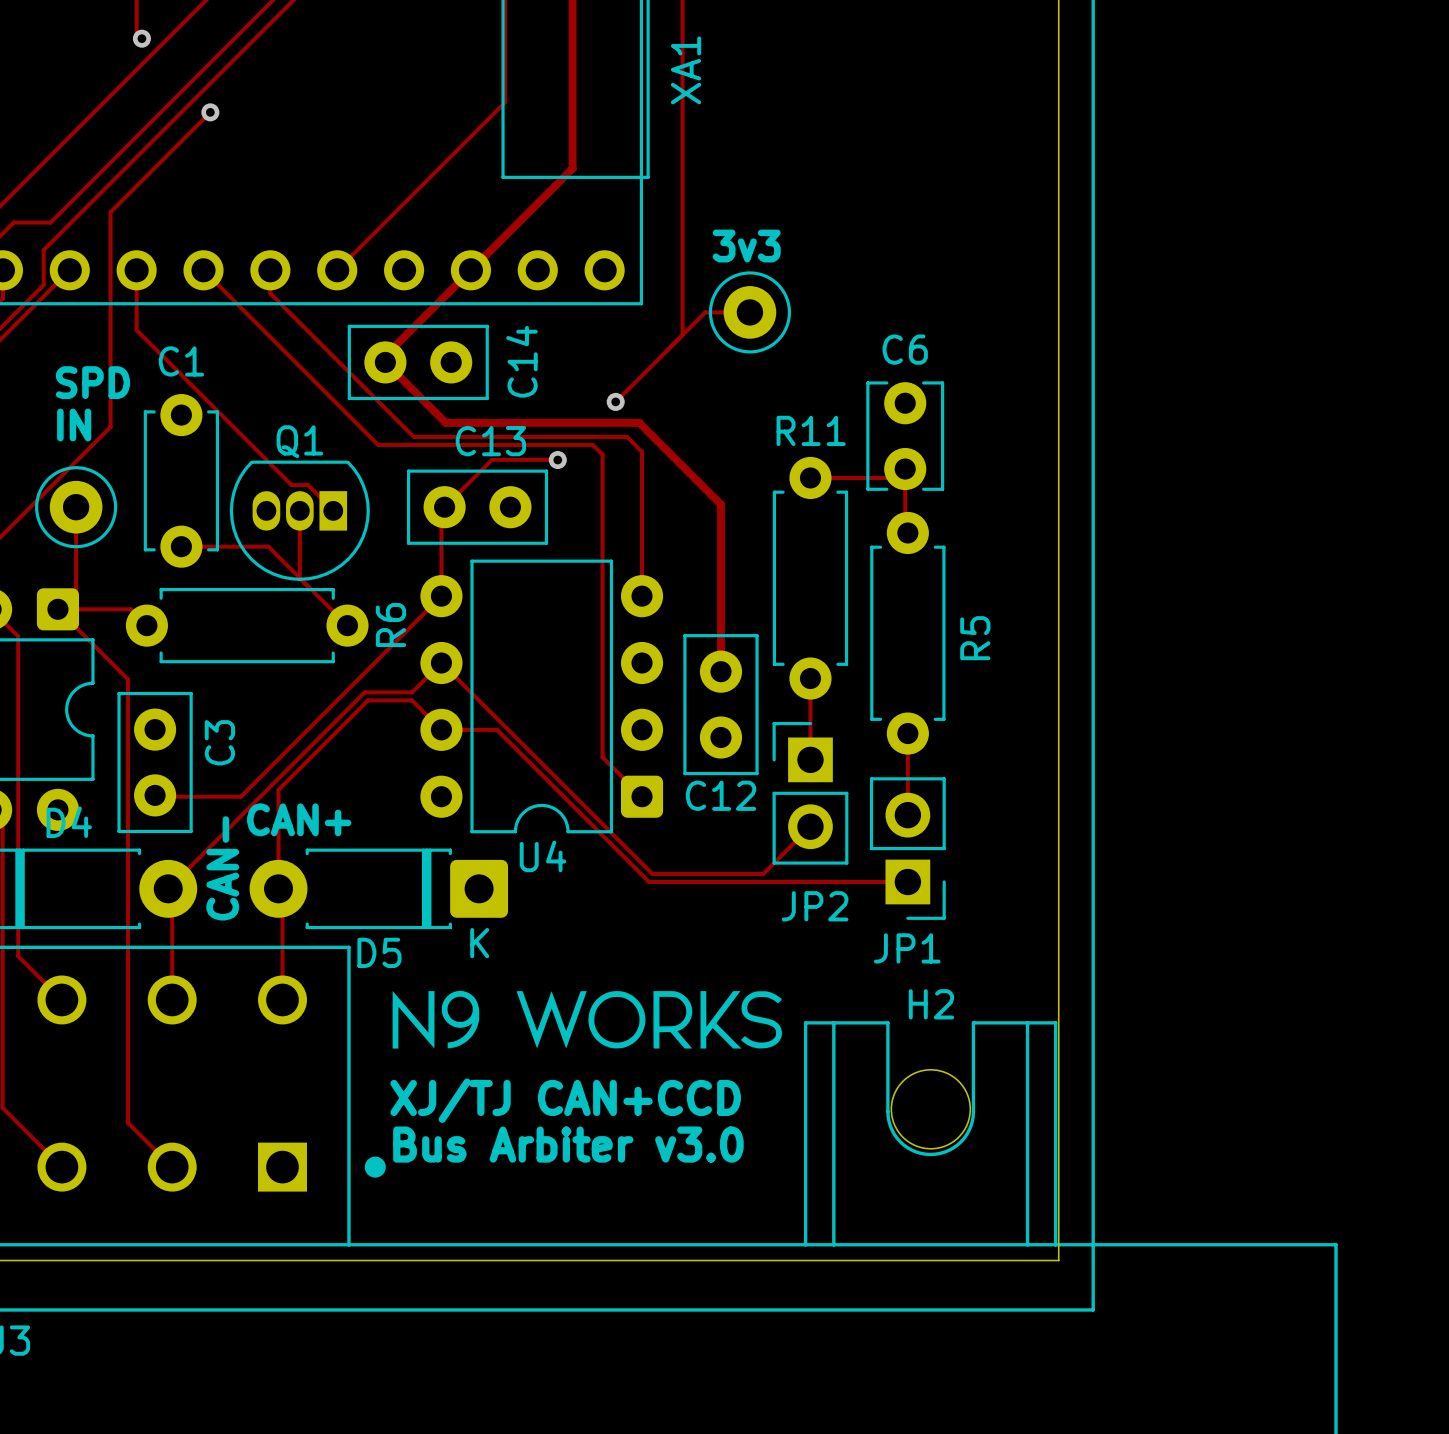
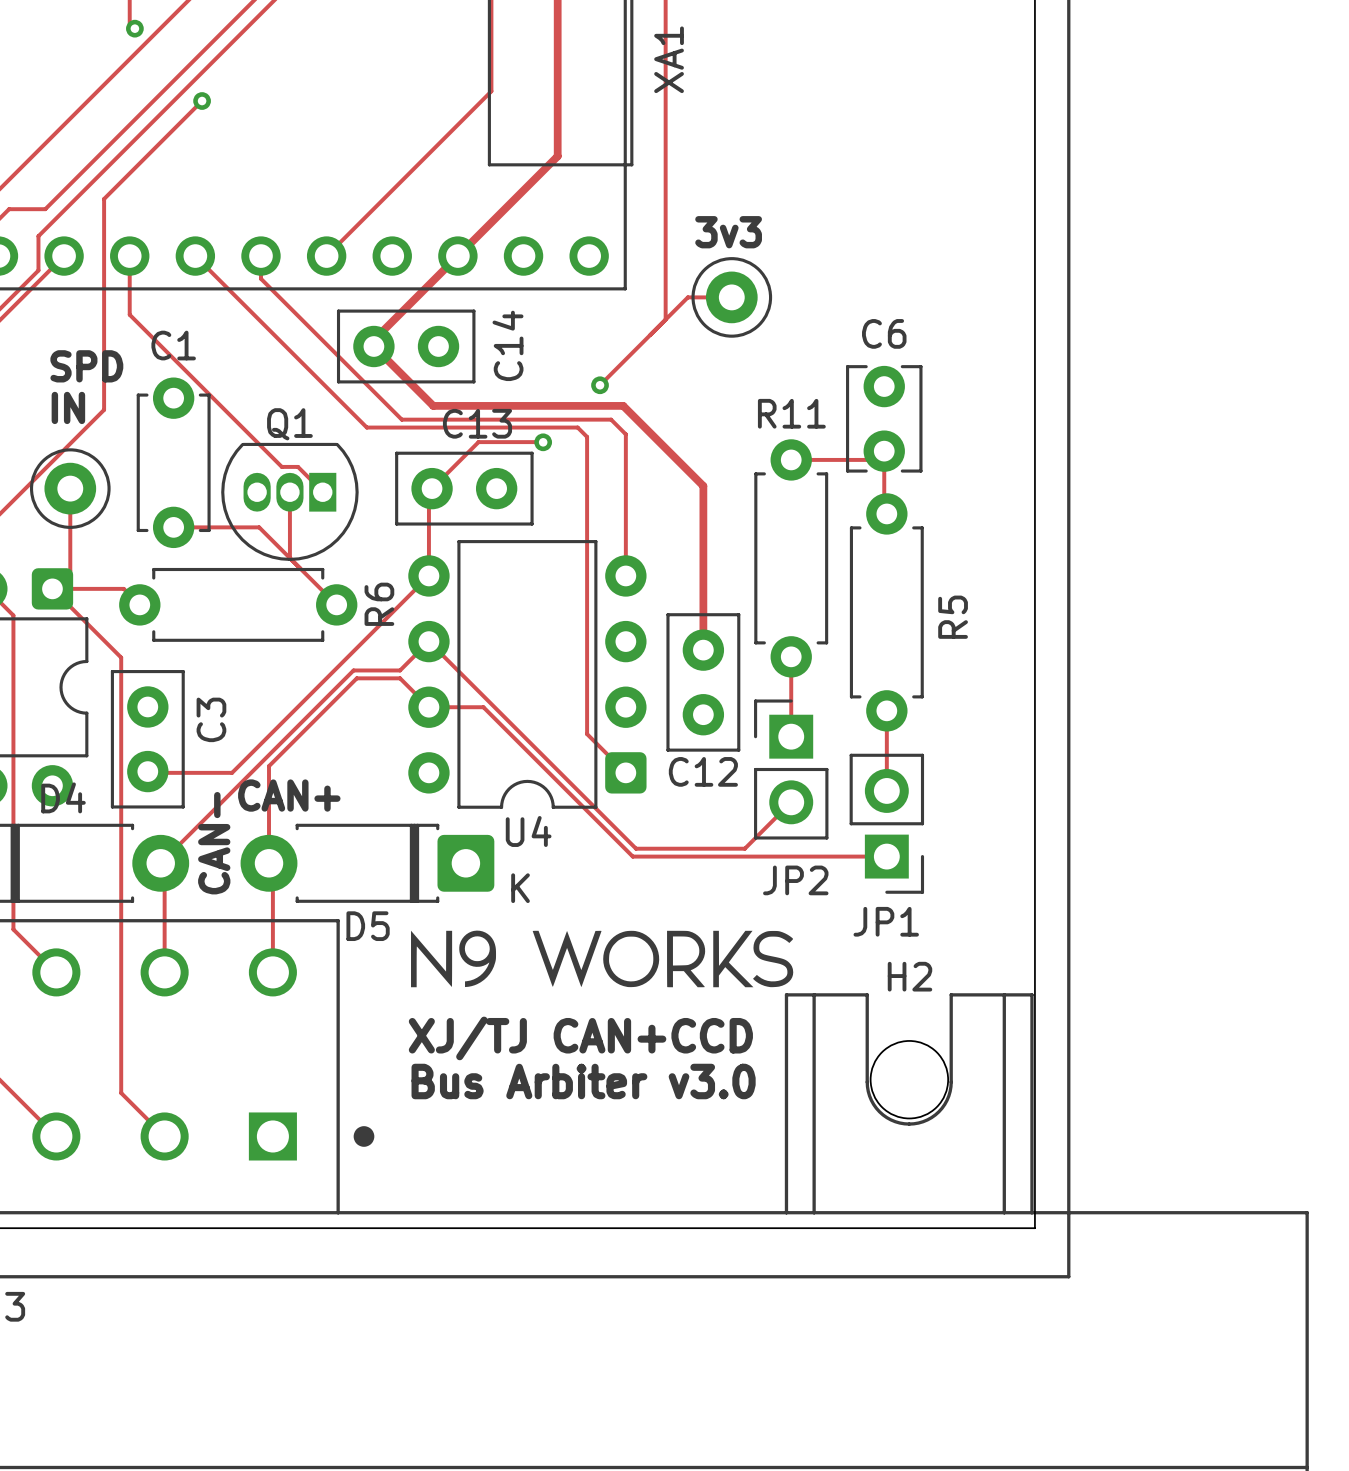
D5 text position: K (479, 943) -> K (520, 888)
drawing position: (587, 1019) -> (602, 958)
text position: XJ/TJ CAN+CCD (565, 1100) -> XJ/TJ CAN+CCD (580, 1038)
text position: Bus Arbiter v3.0 (568, 1144) -> Bus Arbiter v3.0 (583, 1081)

